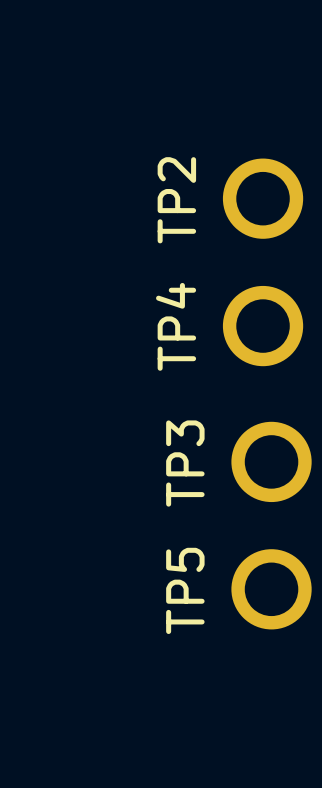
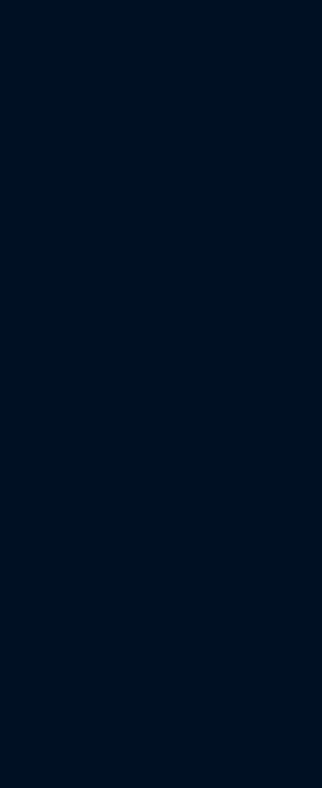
TP2: (263, 198) -> none
TP4: (263, 326) -> none
TP3: (271, 461) -> none
TP5: (271, 589) -> none

